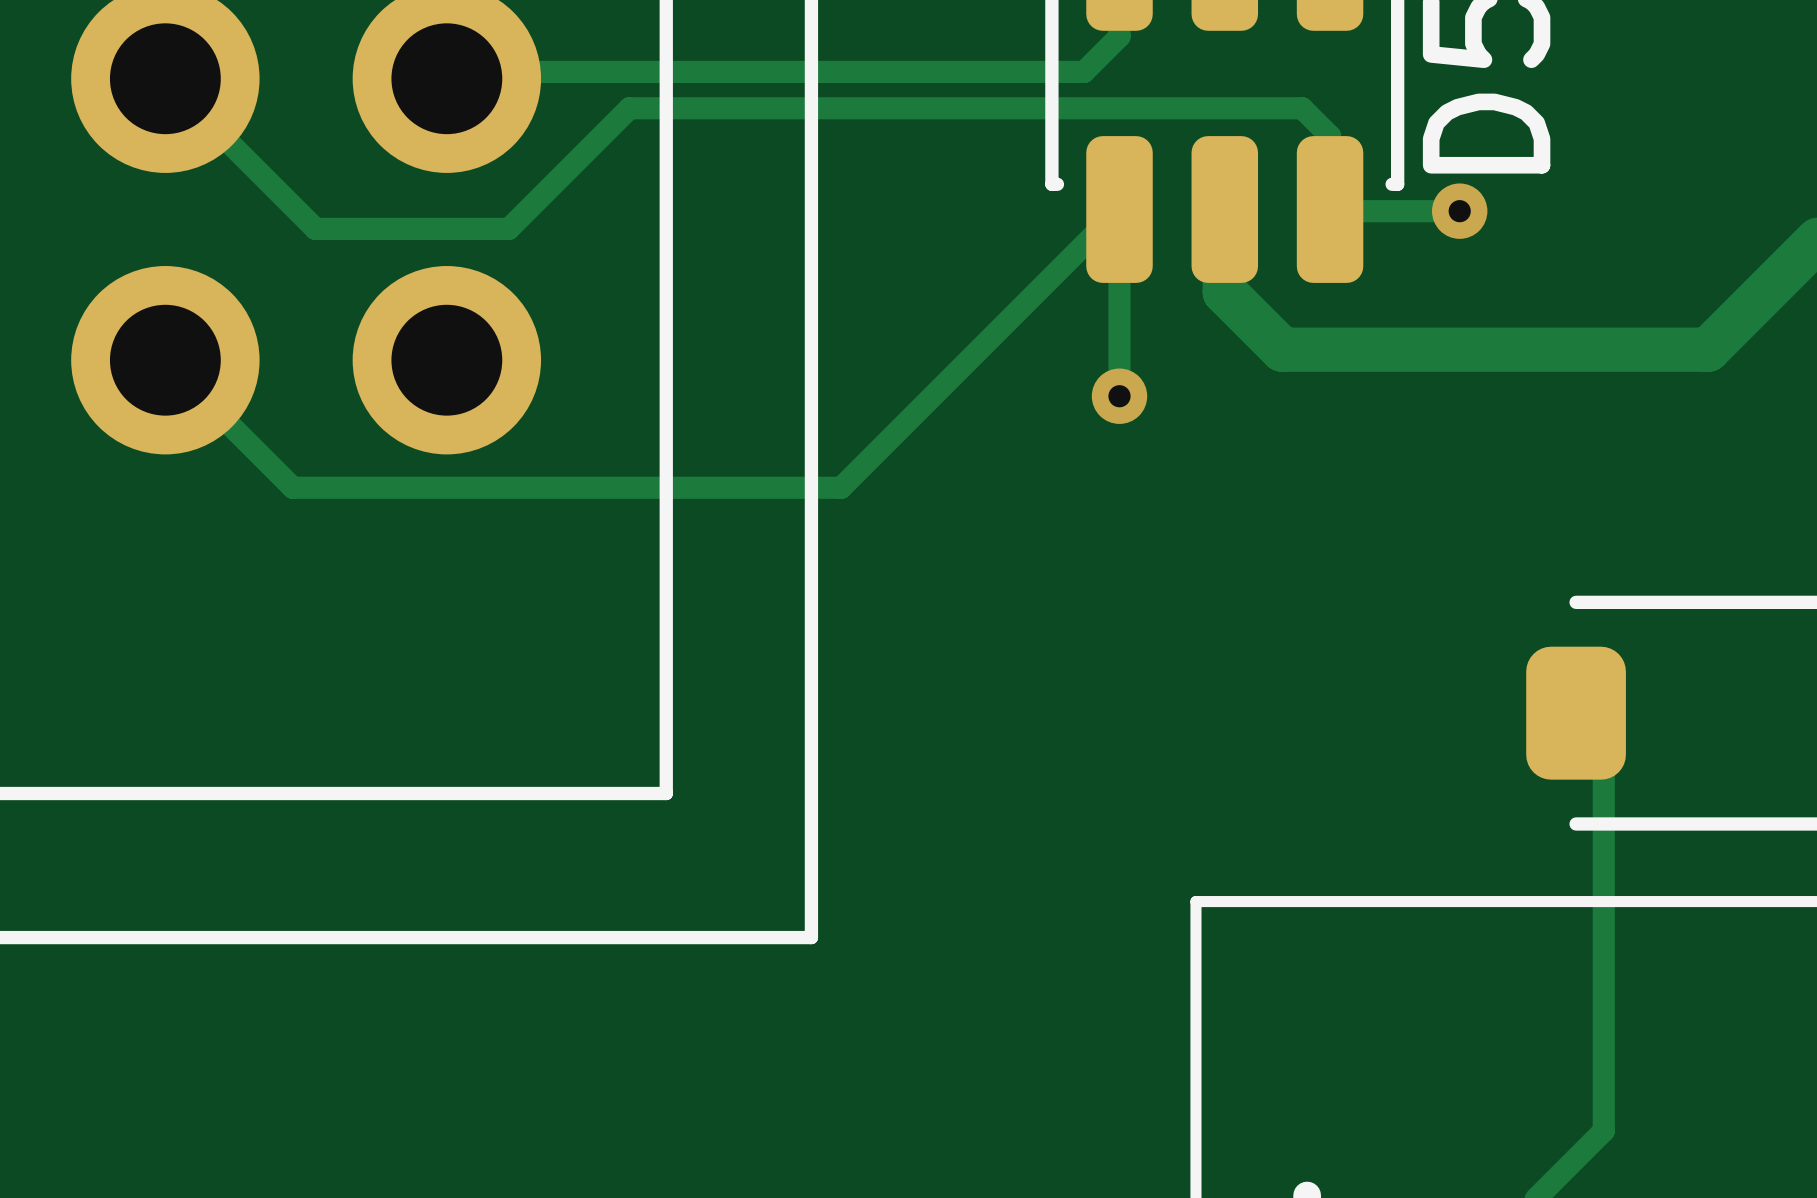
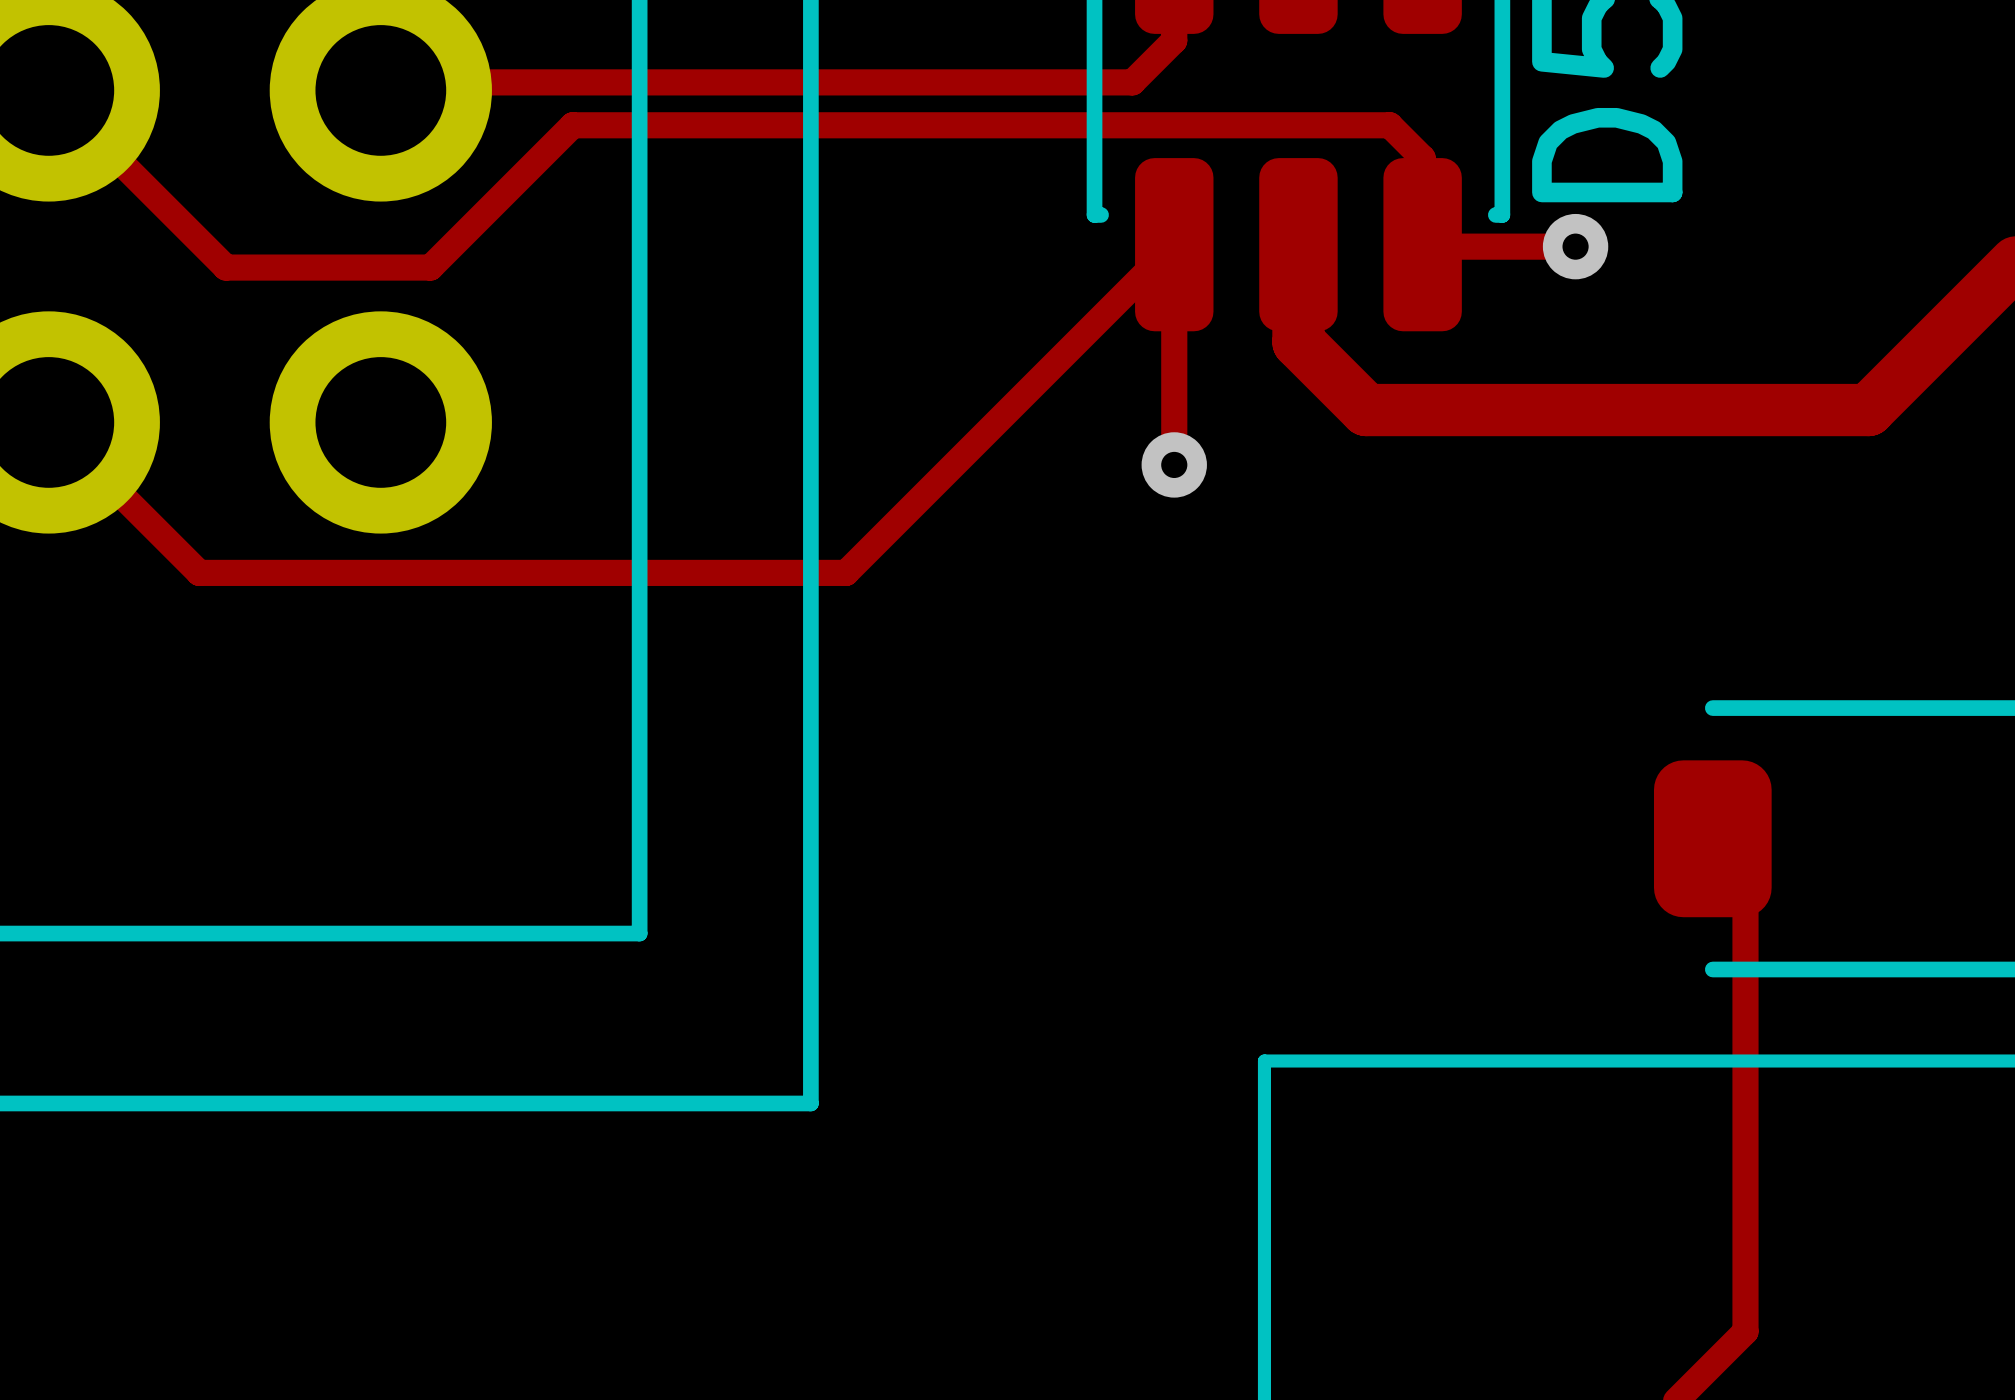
track: (629, 108) (508, 228) (488, 228) -> (596, 125) (572, 125) (430, 267)

